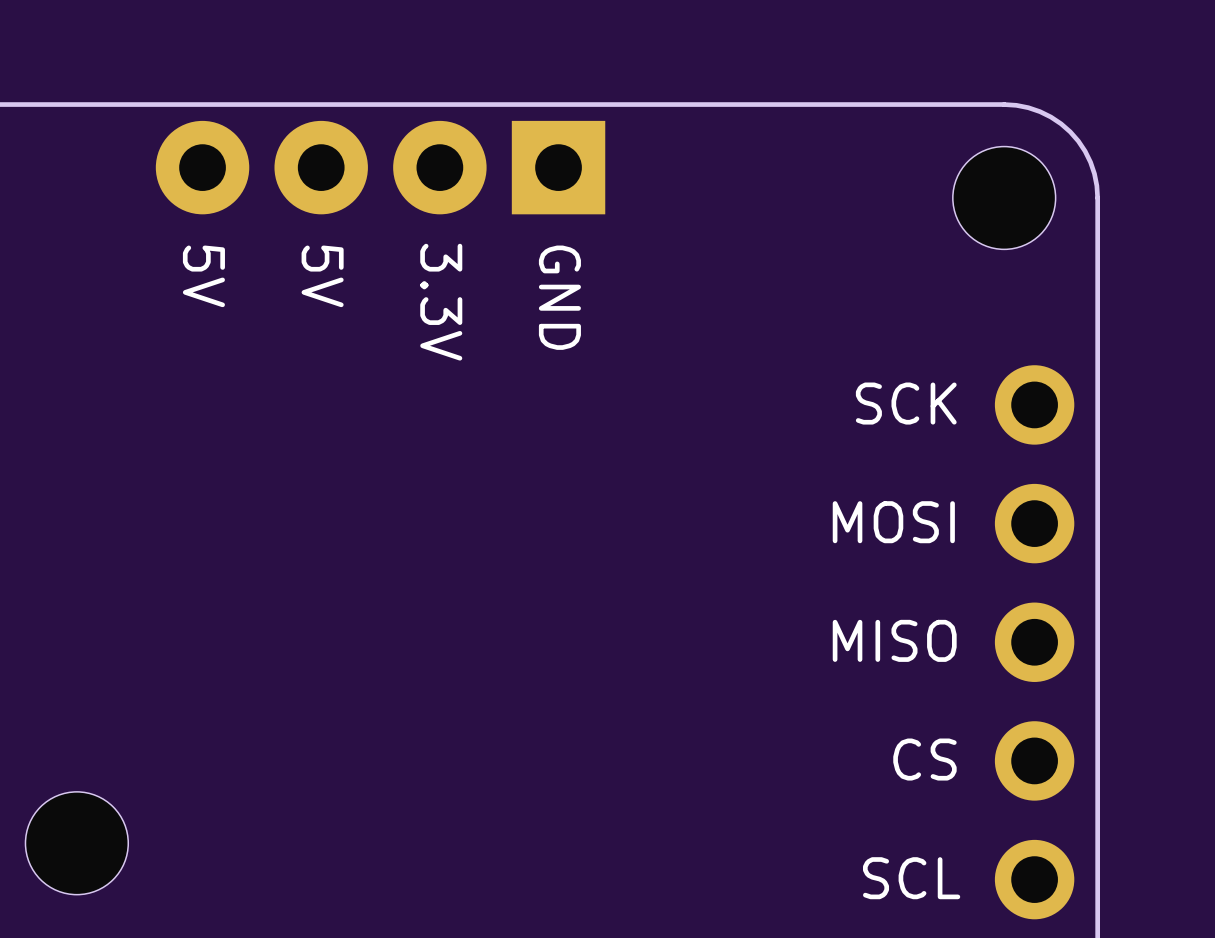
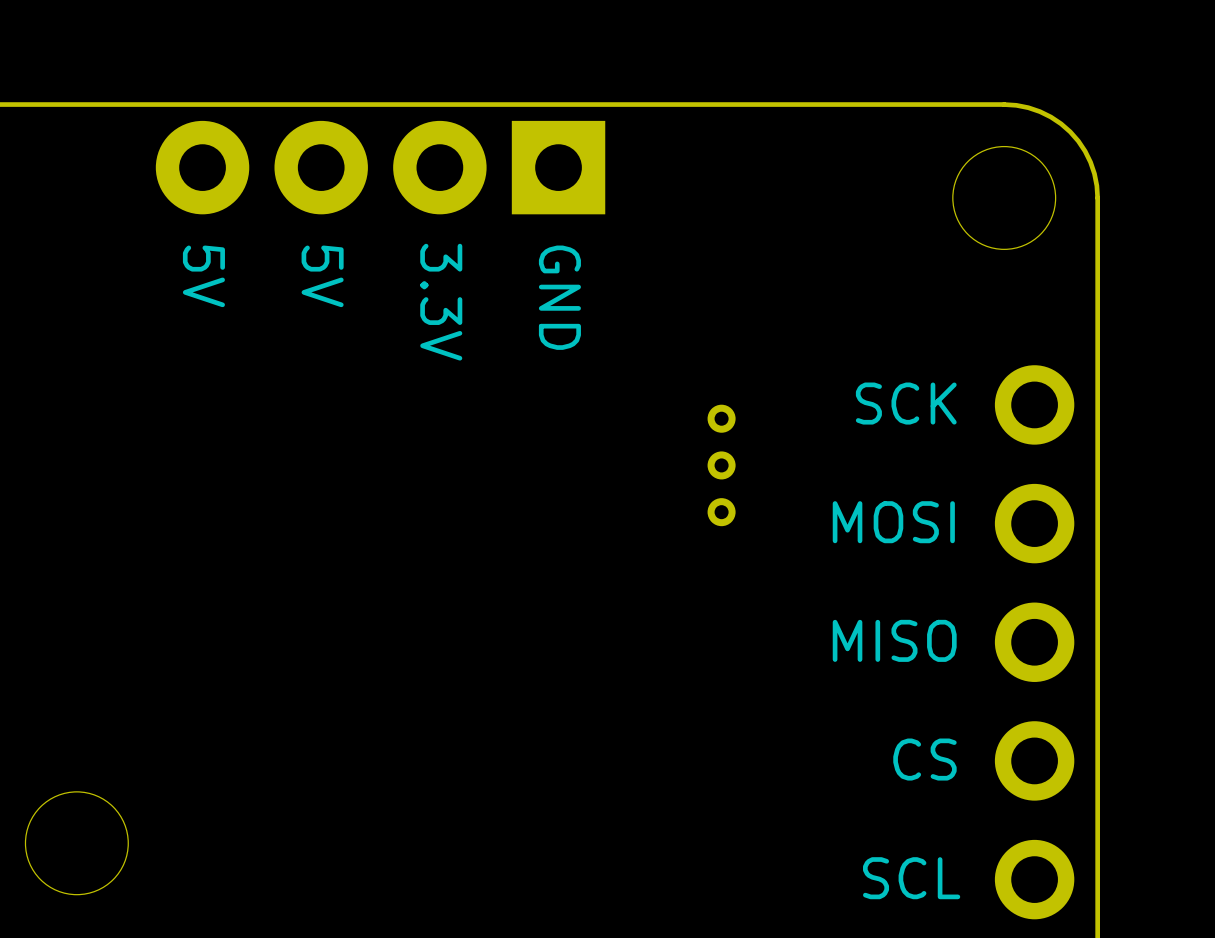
part: none -> (721, 465)

